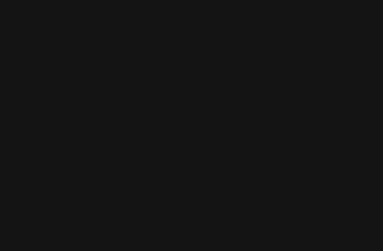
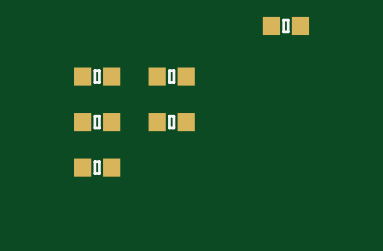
part: none -> (285, 25)
part: none -> (97, 76)
part: none -> (171, 76)
part: none -> (97, 122)
part: none -> (171, 122)
part: none -> (97, 167)

